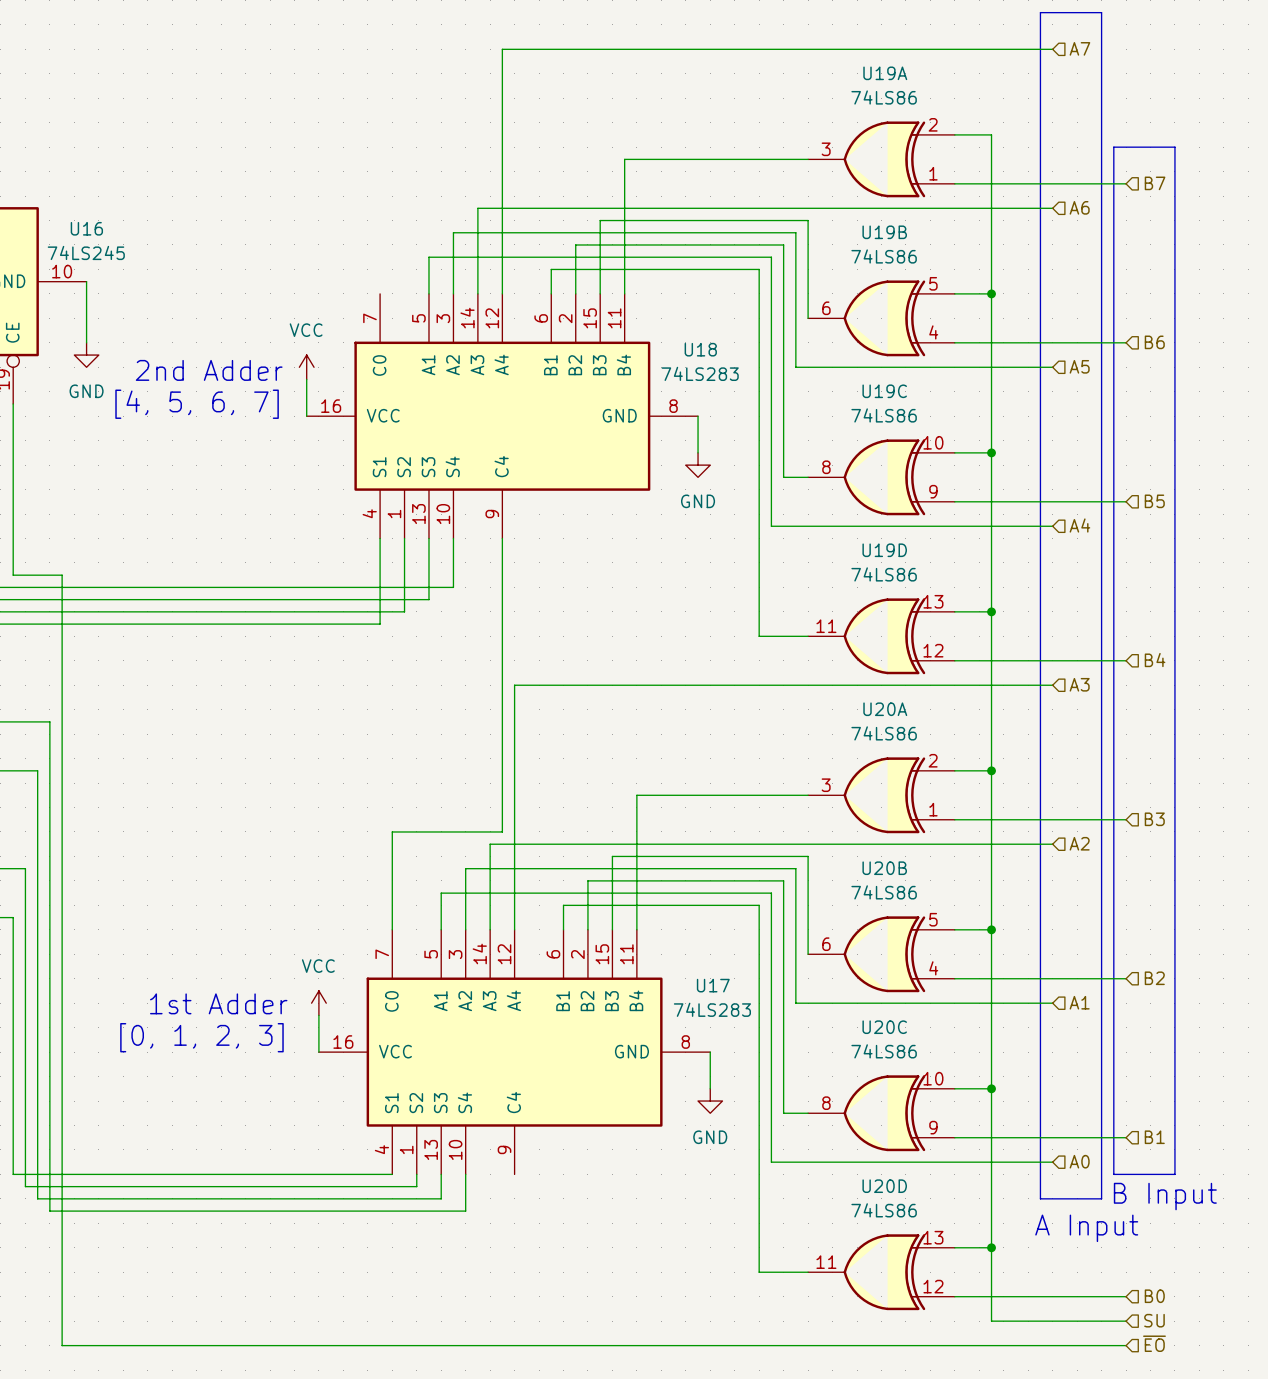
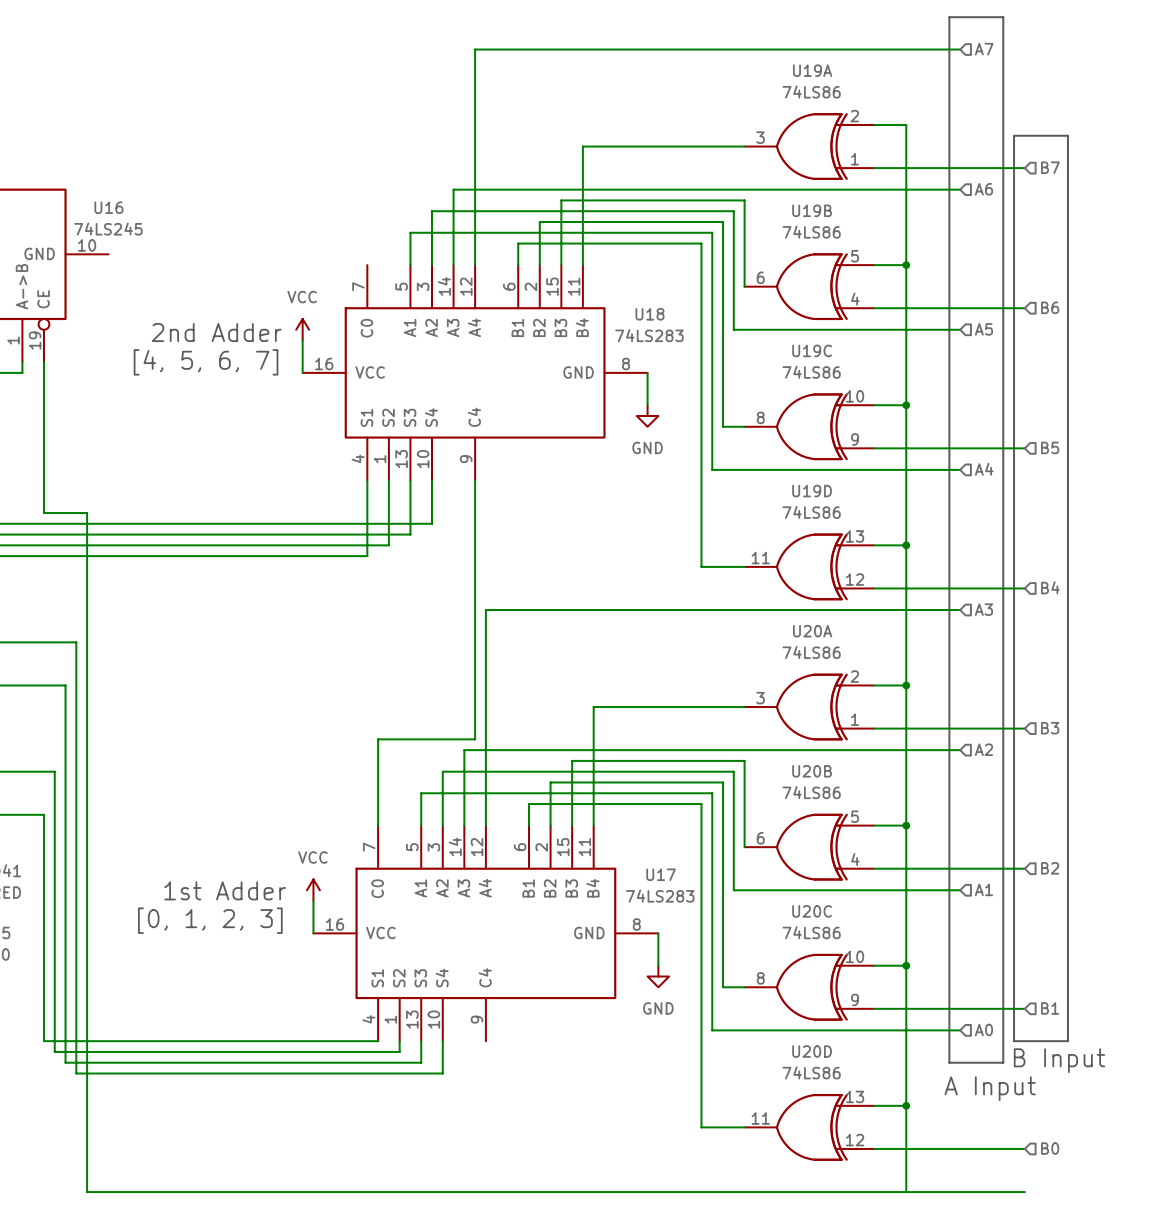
wire: (86, 281) (86, 342) -> none
power symbol: GND (86, 355) -> none
hierarchical label: SU (1154, 1320) -> none
wire: (991, 1321) (1126, 1321) -> (906, 1170) (906, 1192)
hierarchical label: ~{EO} (1154, 1343) -> none

